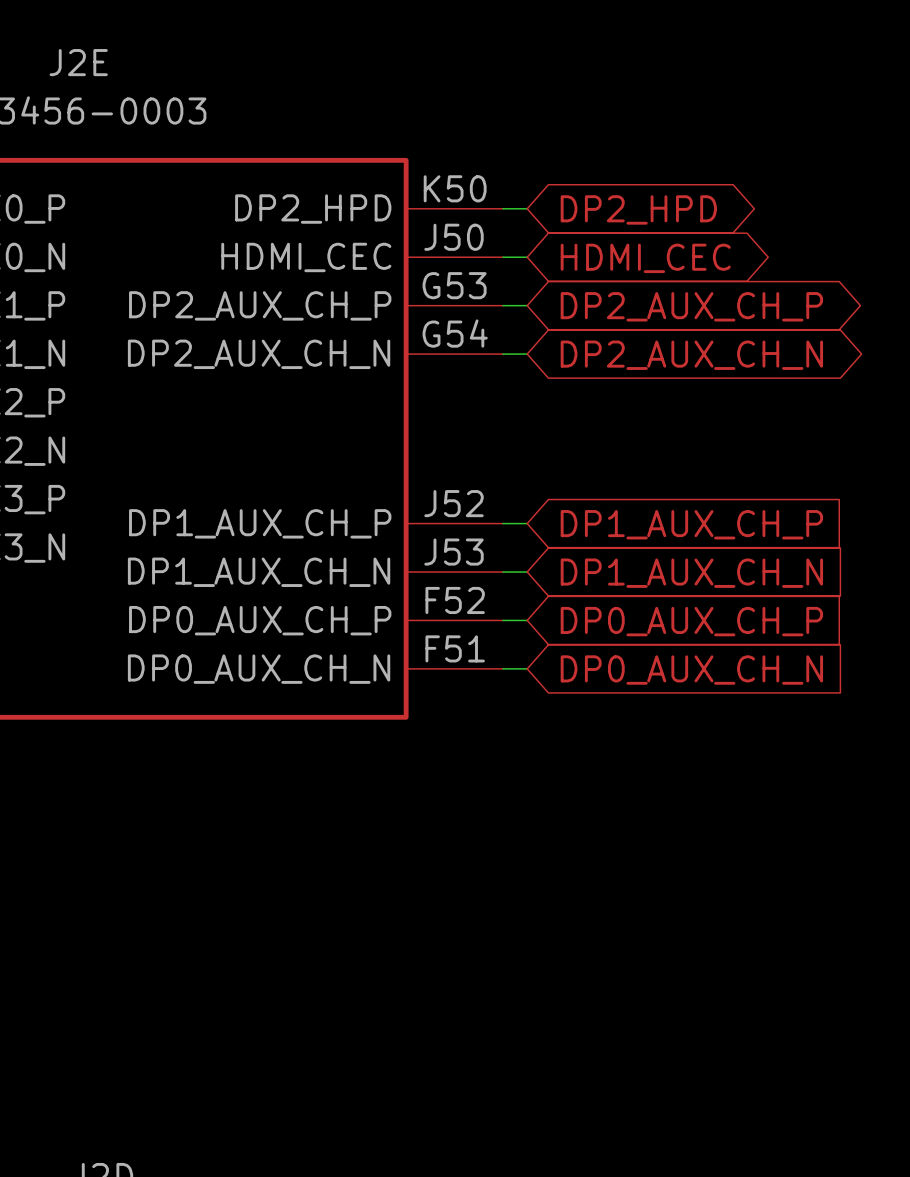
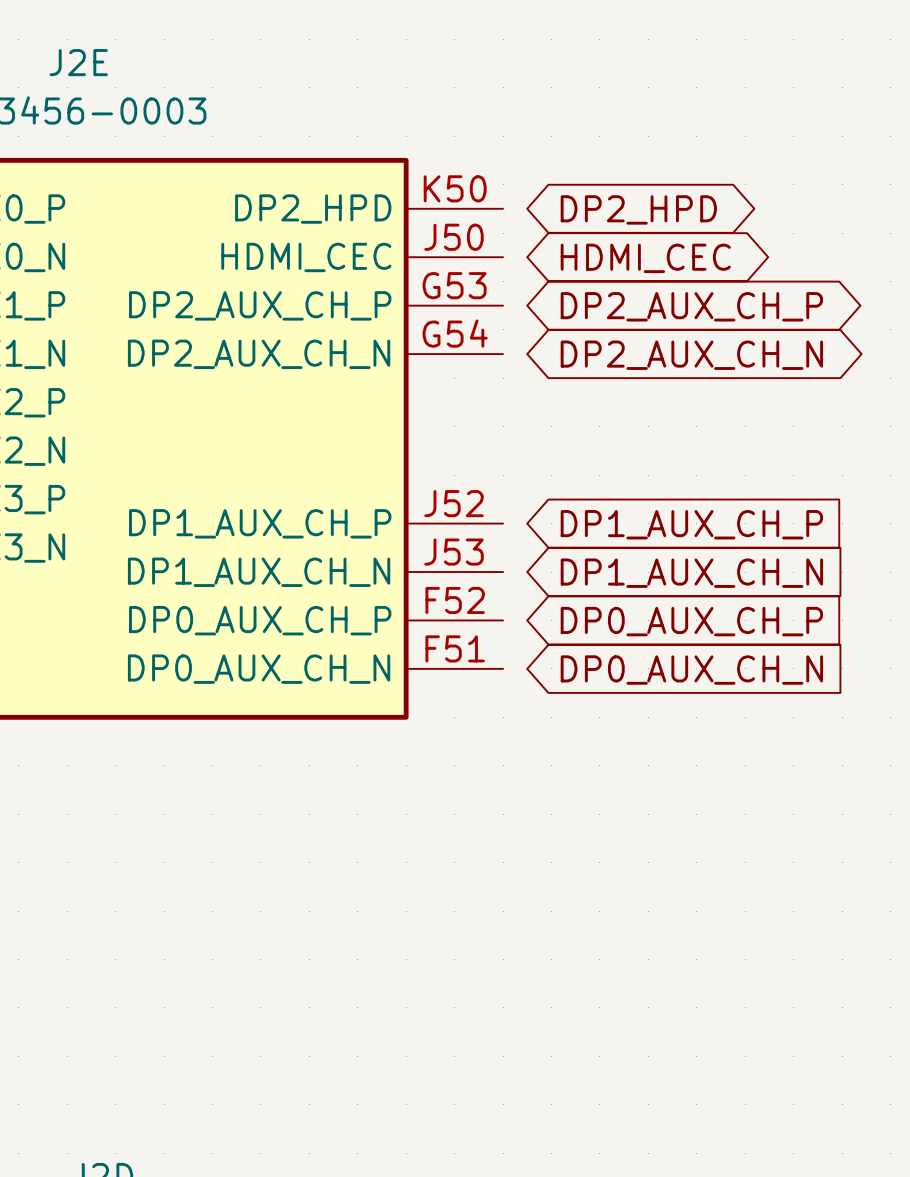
wire: (503, 208) (527, 208) -> none
wire: (503, 257) (527, 257) -> none
wire: (503, 305) (527, 305) -> none
wire: (503, 354) (527, 354) -> none
wire: (503, 523) (527, 523) -> none
wire: (503, 572) (527, 572) -> none
wire: (503, 620) (527, 620) -> none
wire: (503, 668) (527, 668) -> none

